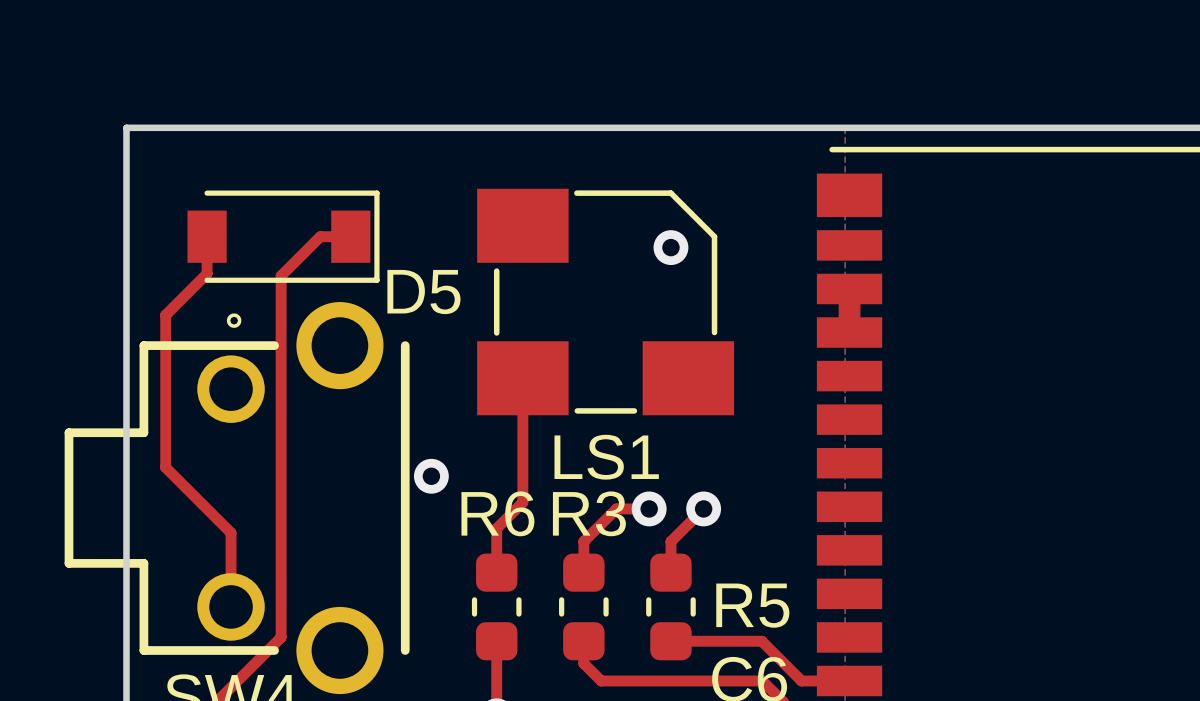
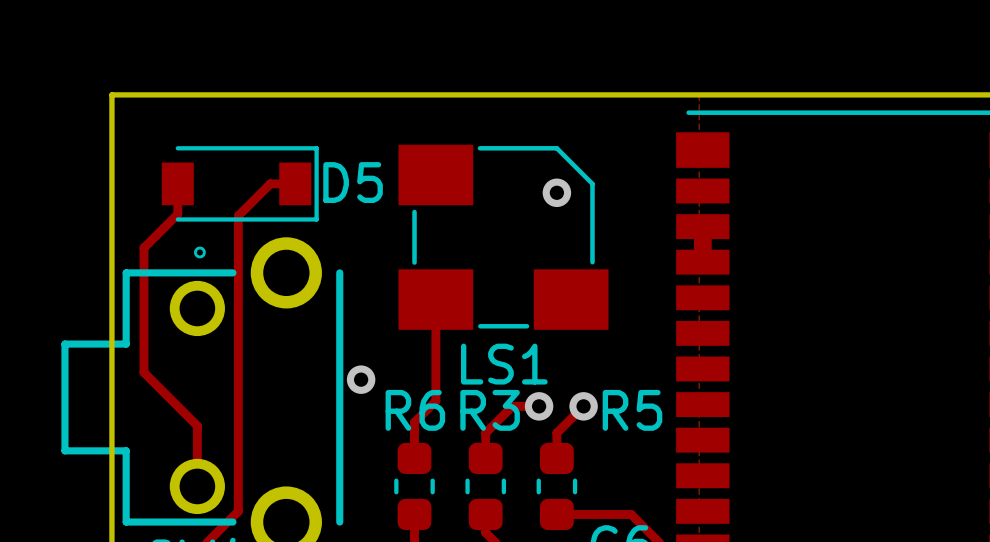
D5 name position: D5 (423, 292) -> D5 (353, 182)
R5 name position: R5 (752, 605) -> R5 (632, 410)

